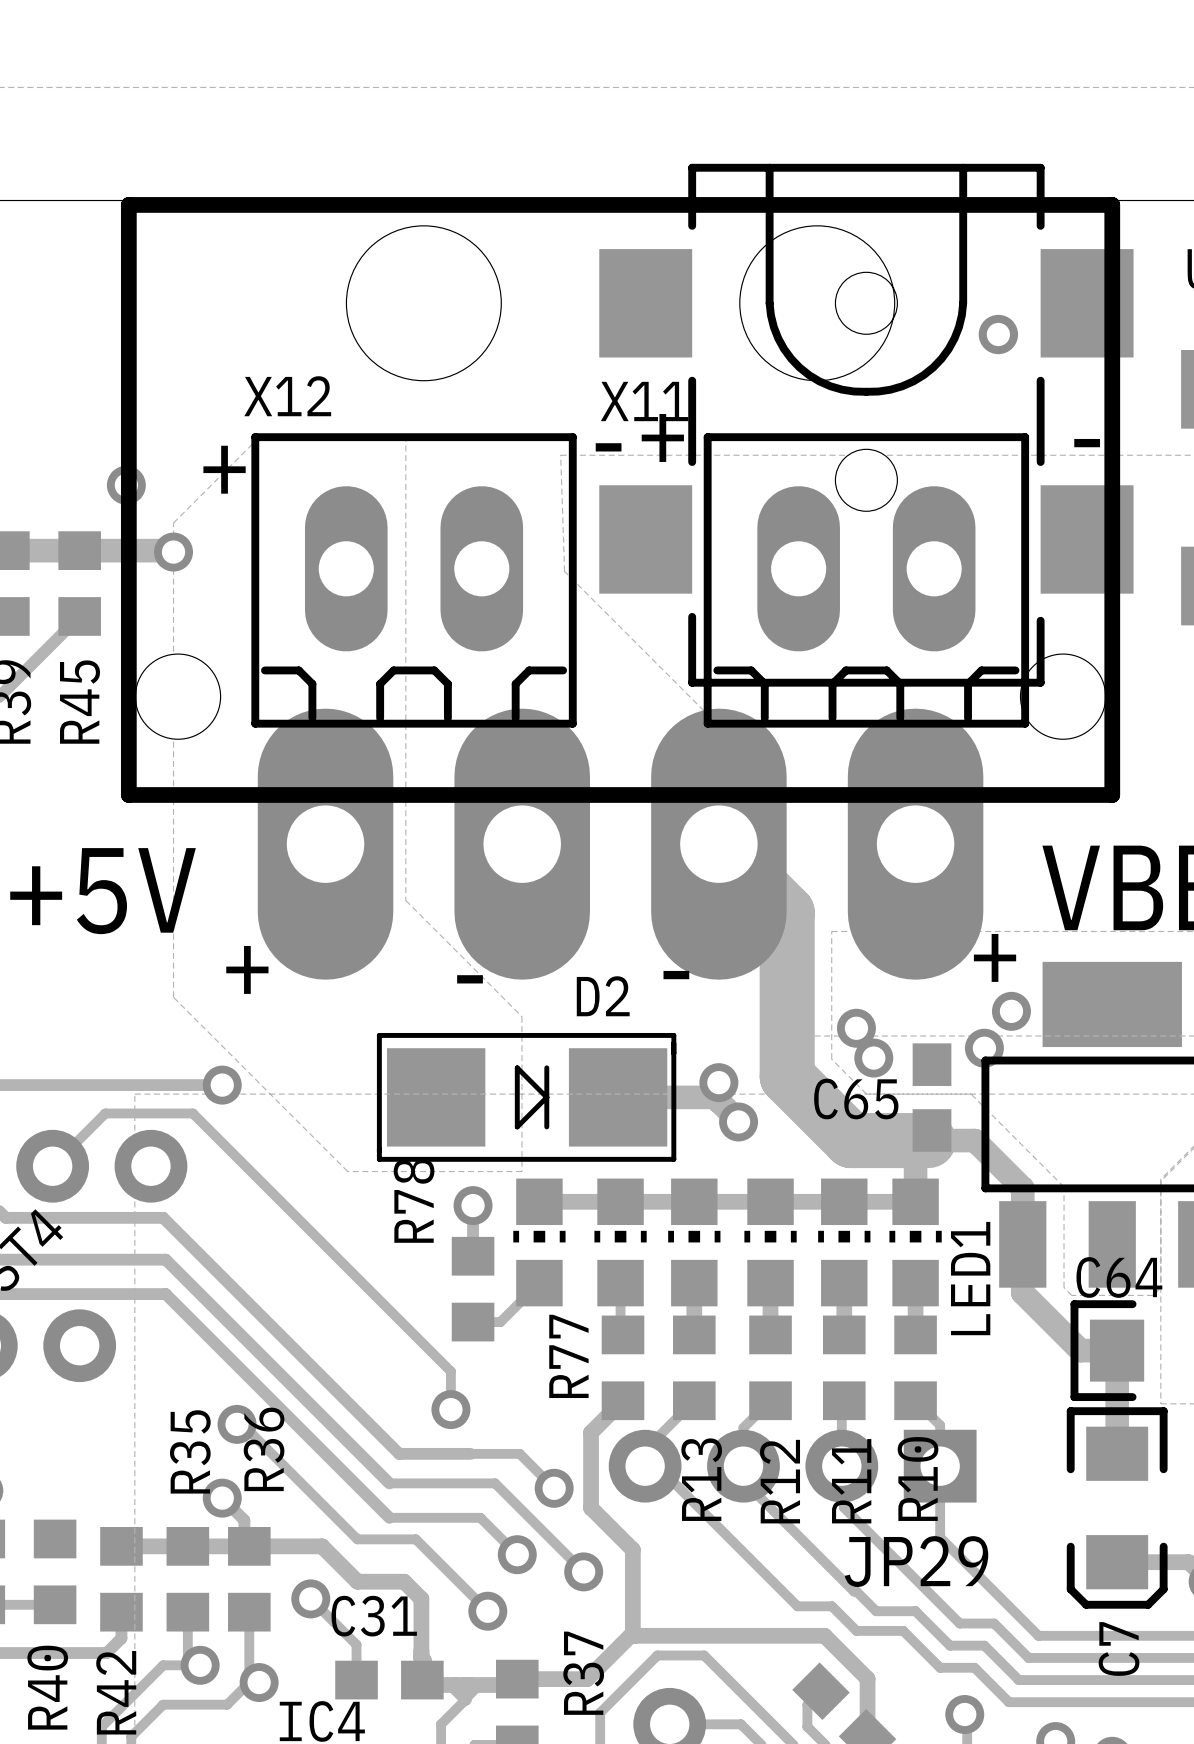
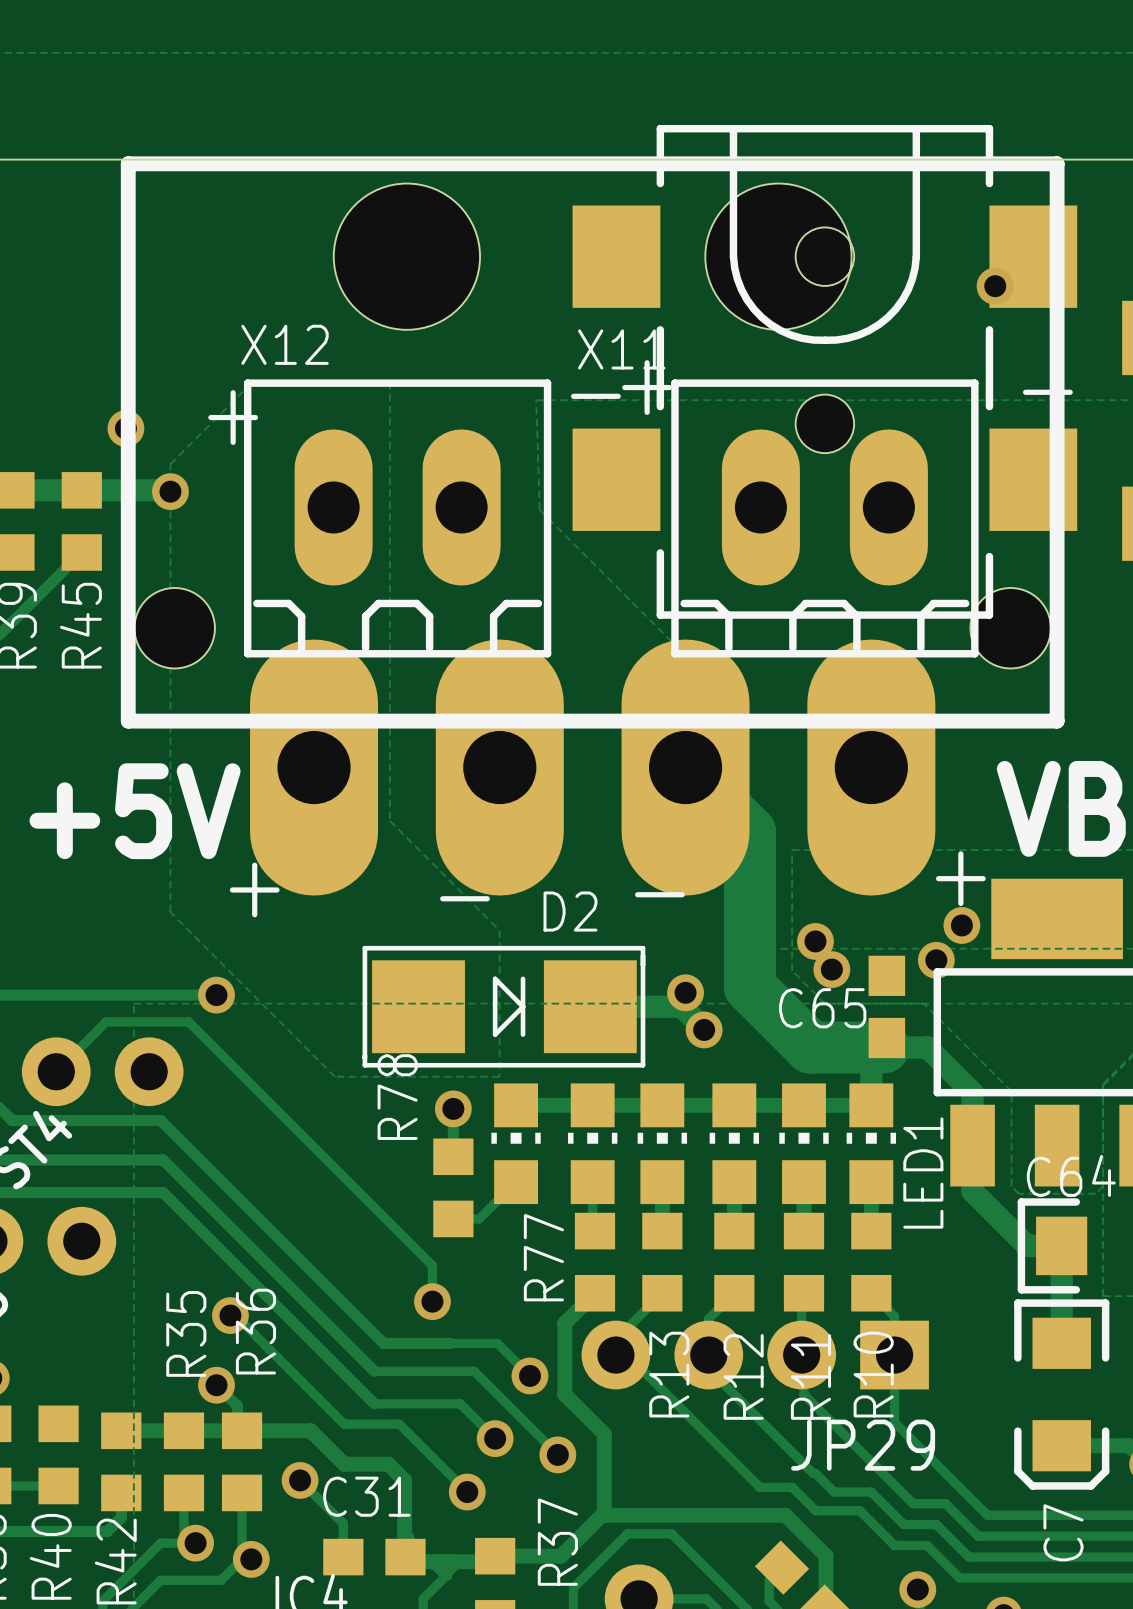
via position: (998, 334) -> (995, 286)

